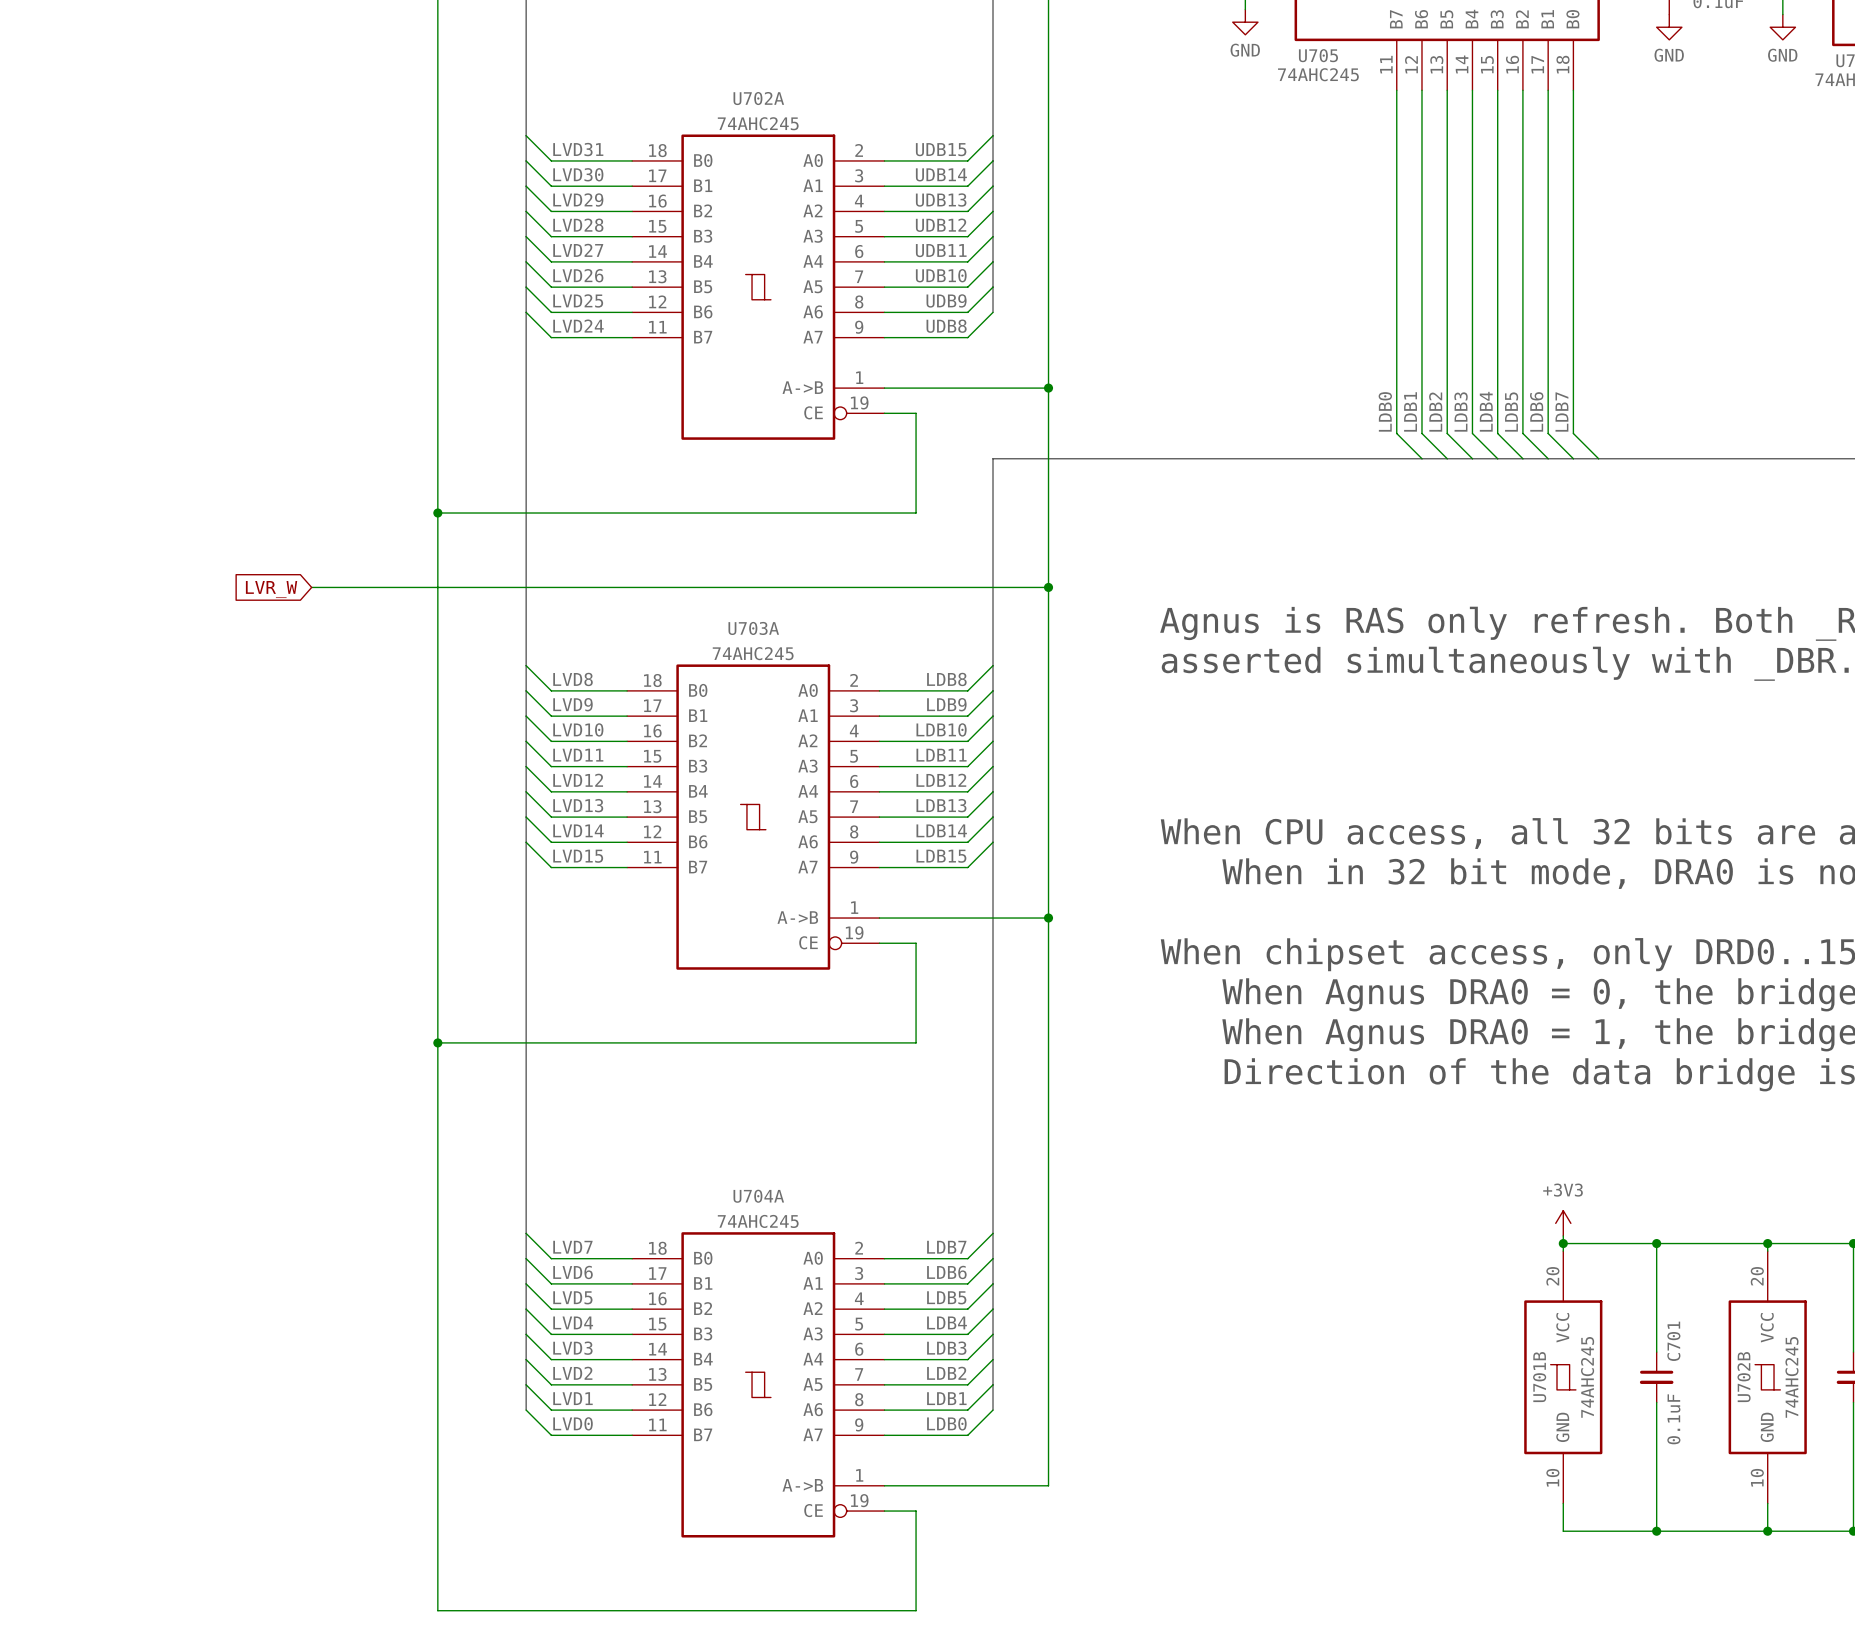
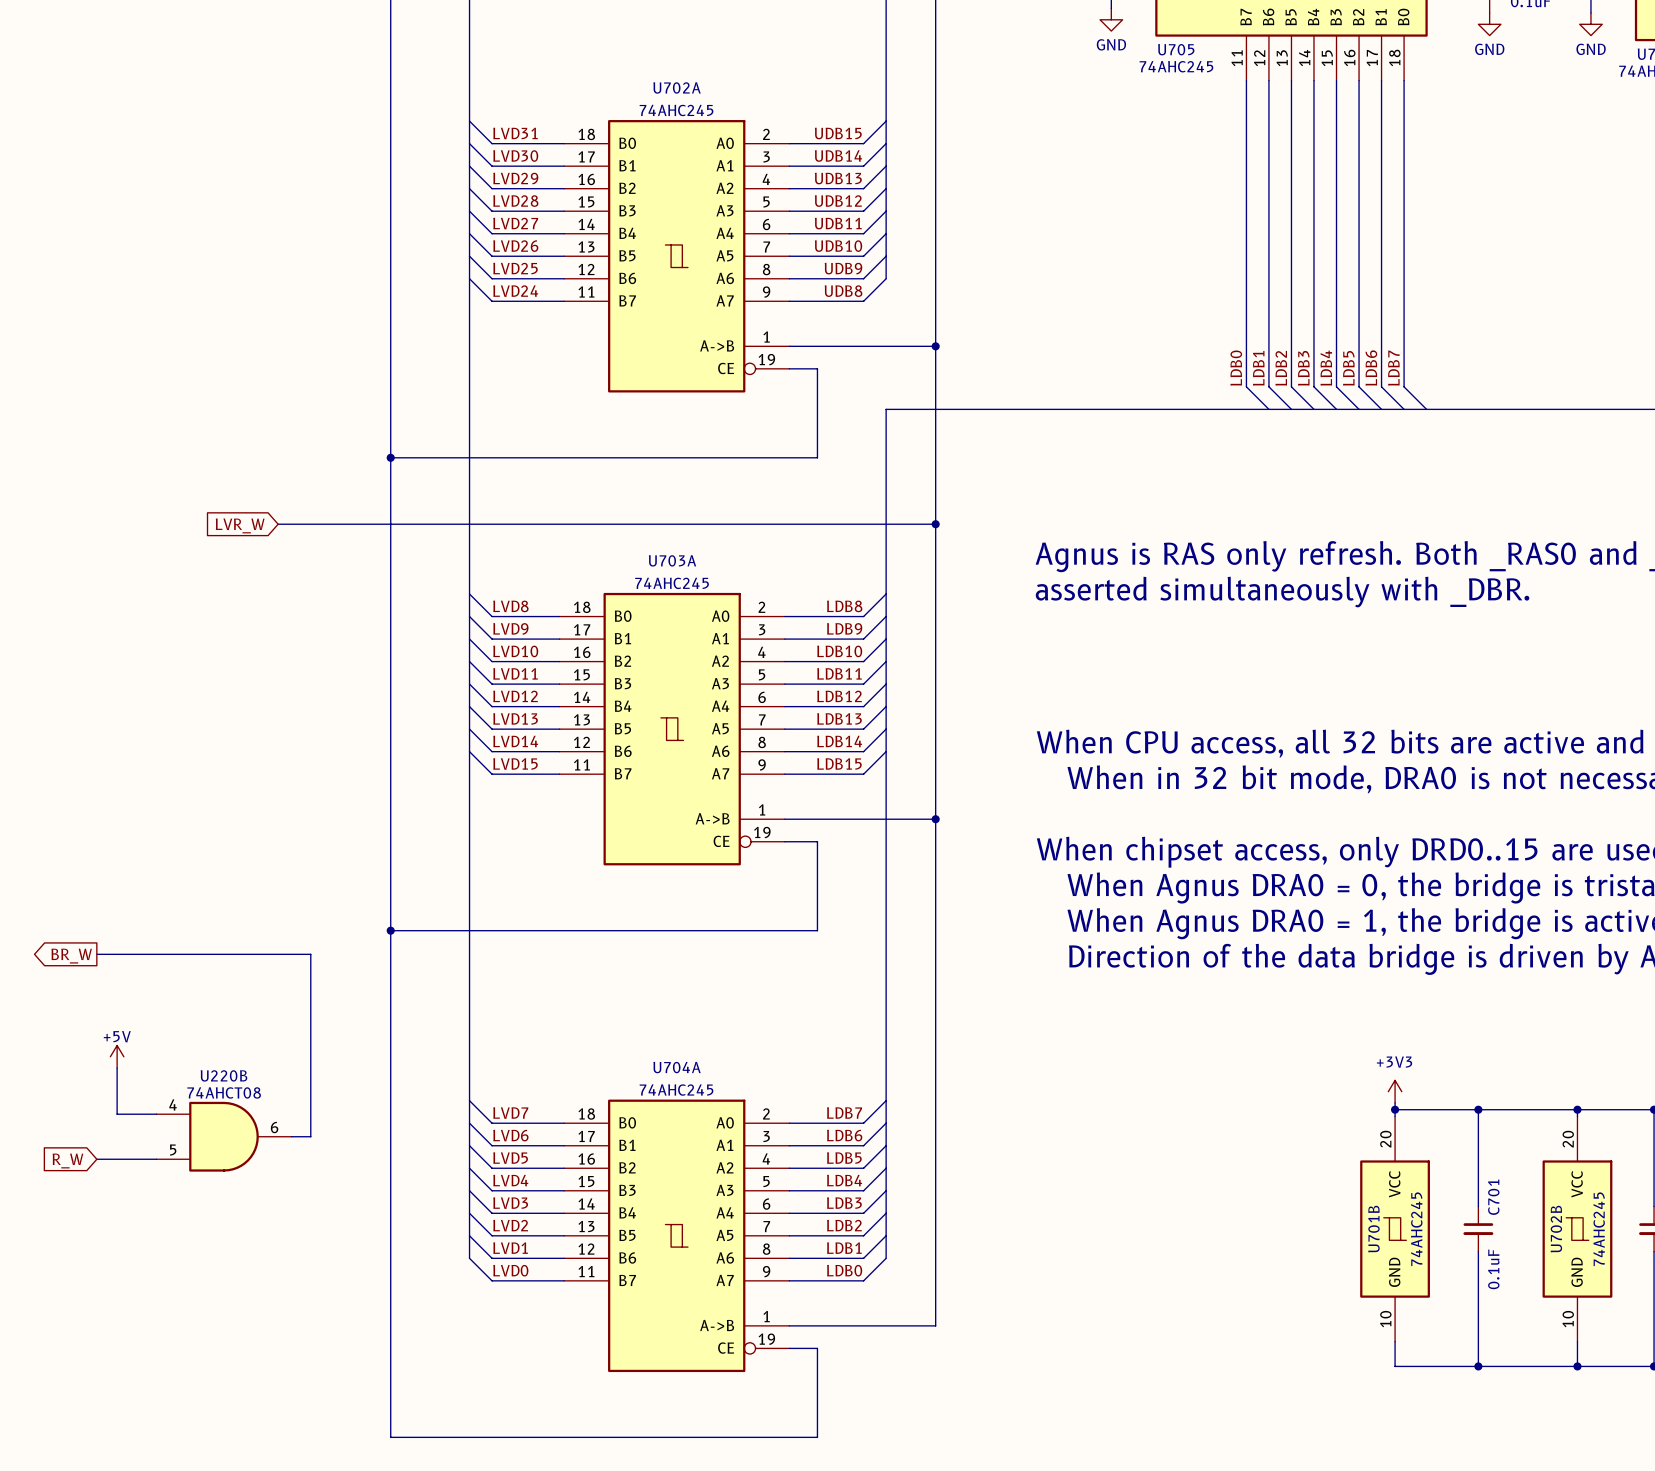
wire: none -> (96, 954) (310, 954) (310, 1136) (291, 1136)
global label: none -> BR_W (71, 956)
power symbol: none -> +5V (117, 1056)
wire: none -> (117, 1068) (117, 1114) (156, 1114)
U220B: none -> 74AHCT08 (224, 1136)
wire: none -> (96, 1159) (156, 1159)
global label: none -> R_W (67, 1160)

